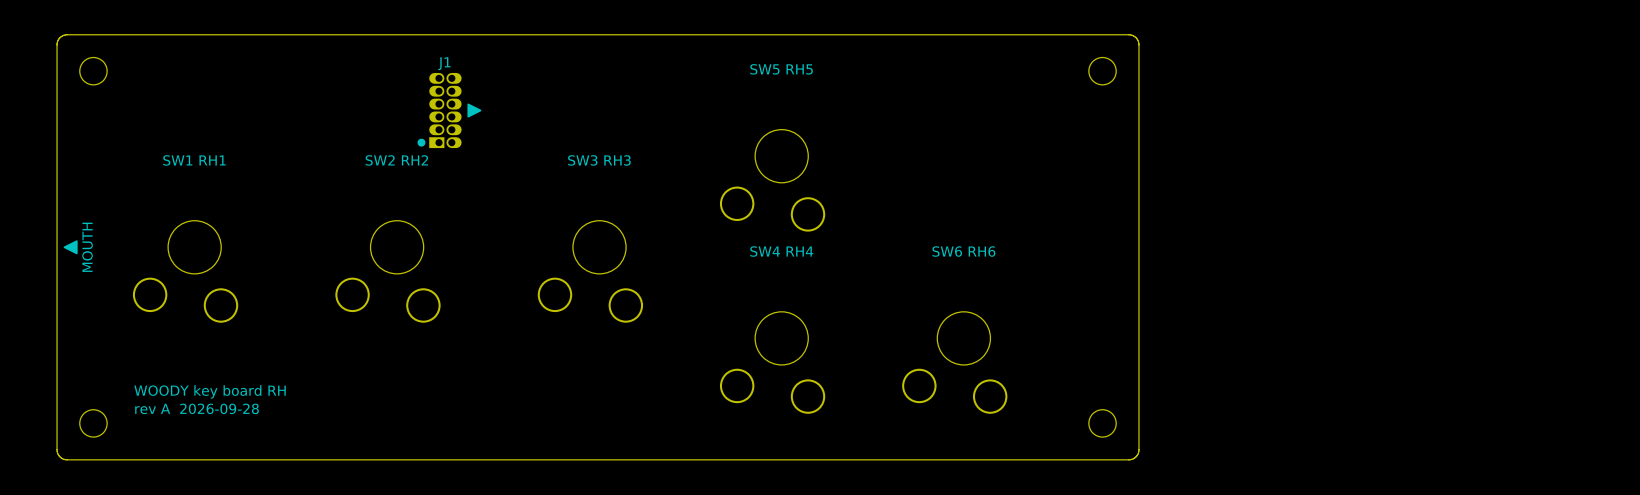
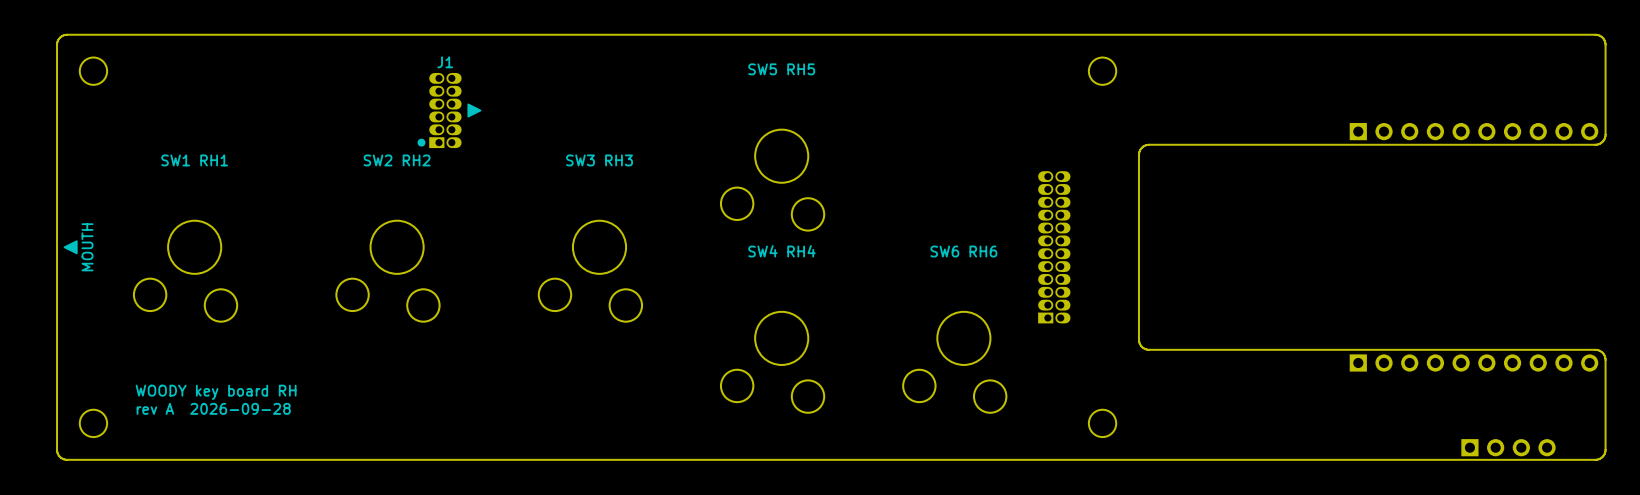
board edge: (1128, 34) (1134, 36) (1138, 43) (1138, 154) -> (1128, 34) (1595, 34) (1601, 36) (1605, 43) (1605, 134) (1603, 140) (1598, 144) (1149, 144) (1141, 147) (1138, 154)
part: none -> (1473, 131)
part: none -> (1054, 247)
board edge: (1138, 339) (1138, 451) (1134, 457) (1128, 459) -> (1138, 339) (1141, 346) (1149, 349) (1597, 349) (1602, 352) (1605, 358) (1605, 451) (1601, 457) (1595, 459) (1128, 459)
part: none -> (1473, 362)
part: none -> (1508, 447)

